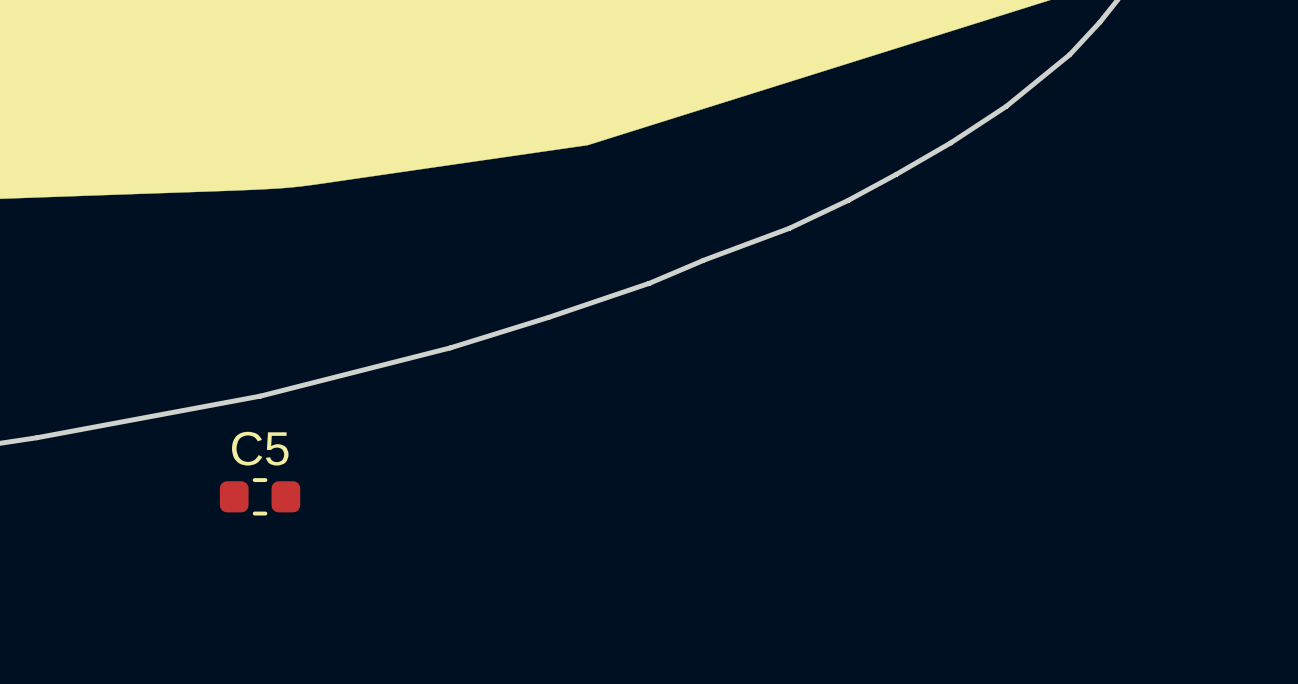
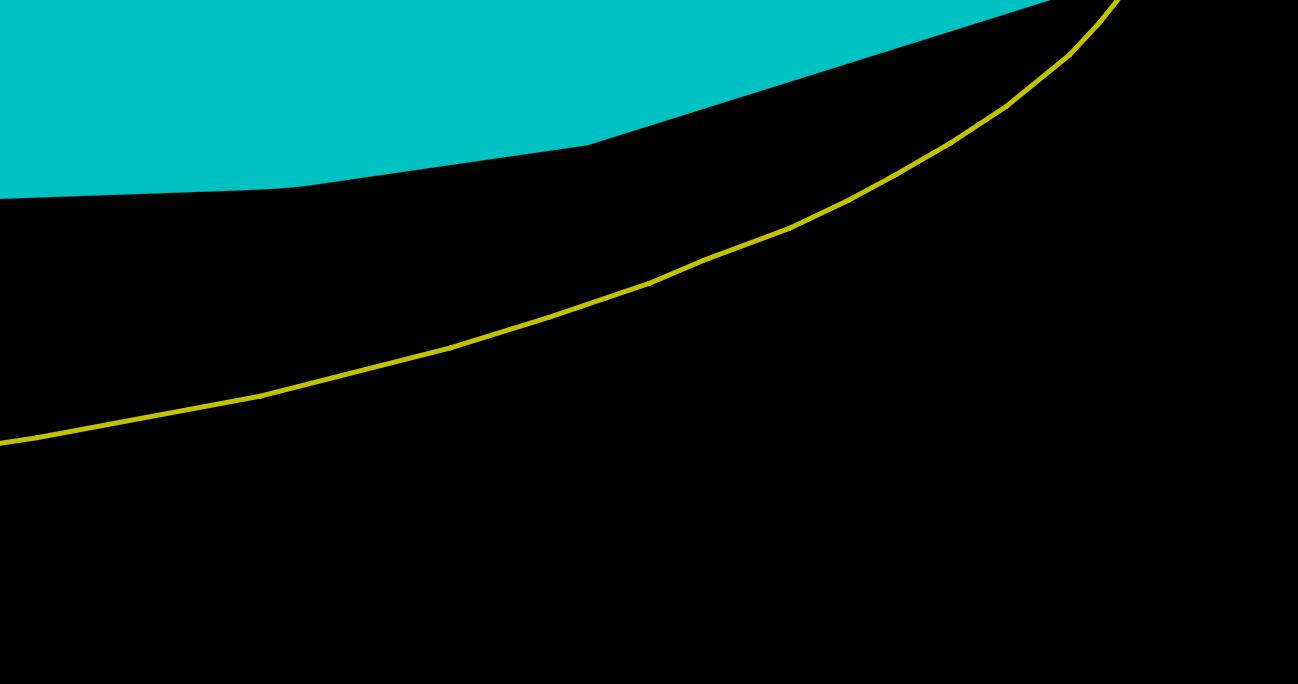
C5: (260, 496) -> none

